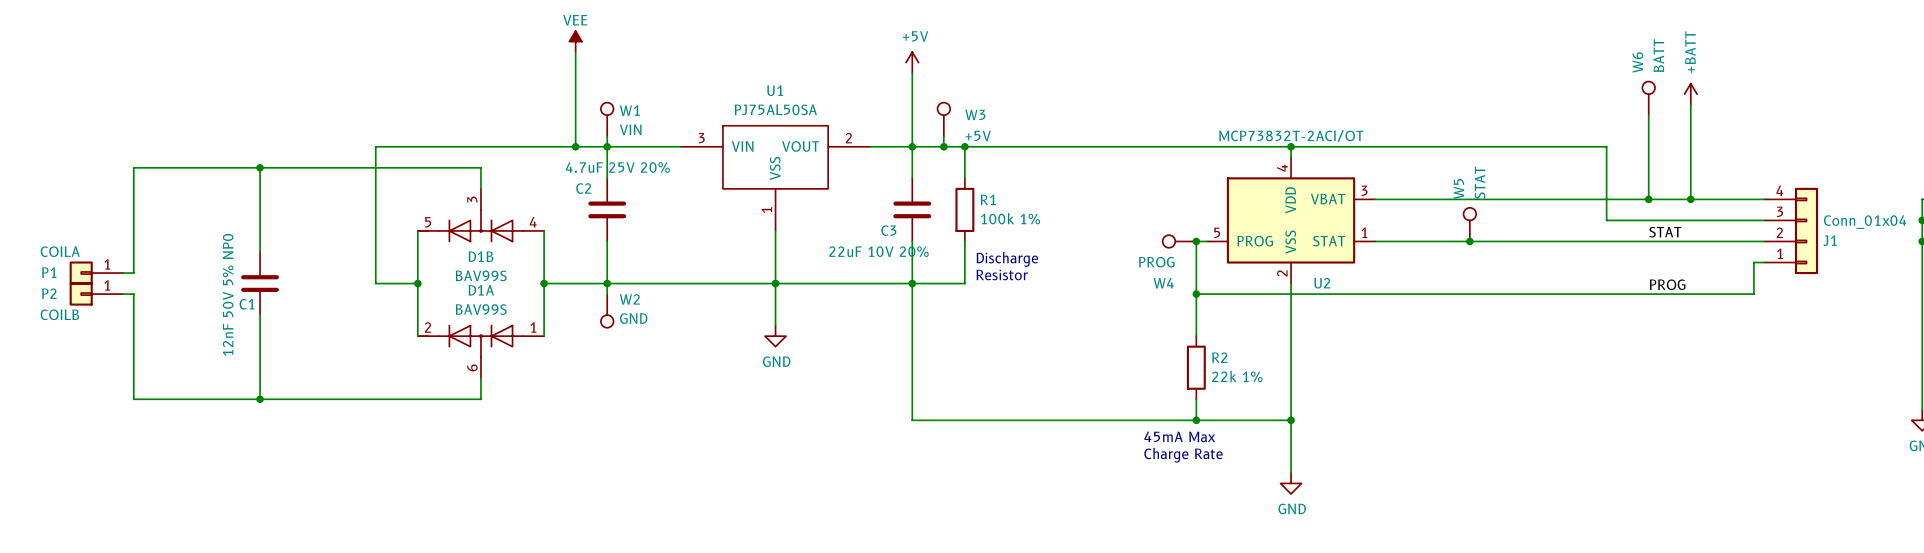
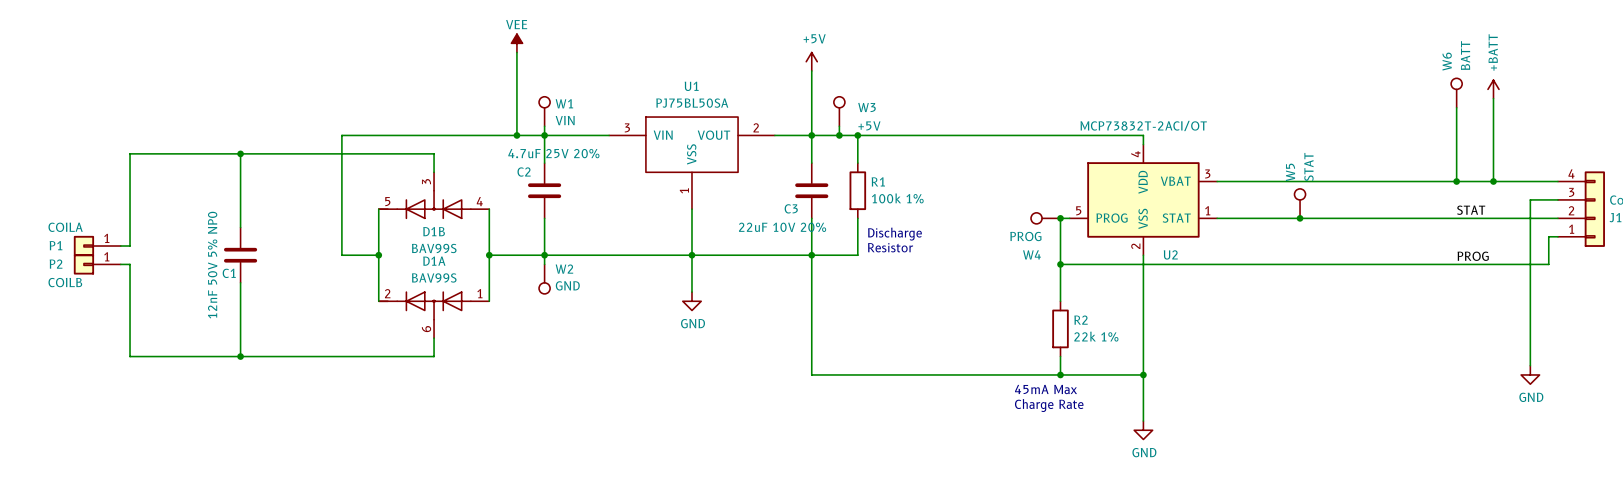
U1 value: PJ75AL50SA (775, 109) -> PJ75BL50SA (692, 103)
wire: (1291, 146) (1606, 146) (1606, 220) (1732, 220) -> (1530, 365) (1530, 199)
junction: (1291, 146) -> none
power symbol: none -> GND (1530, 374)

